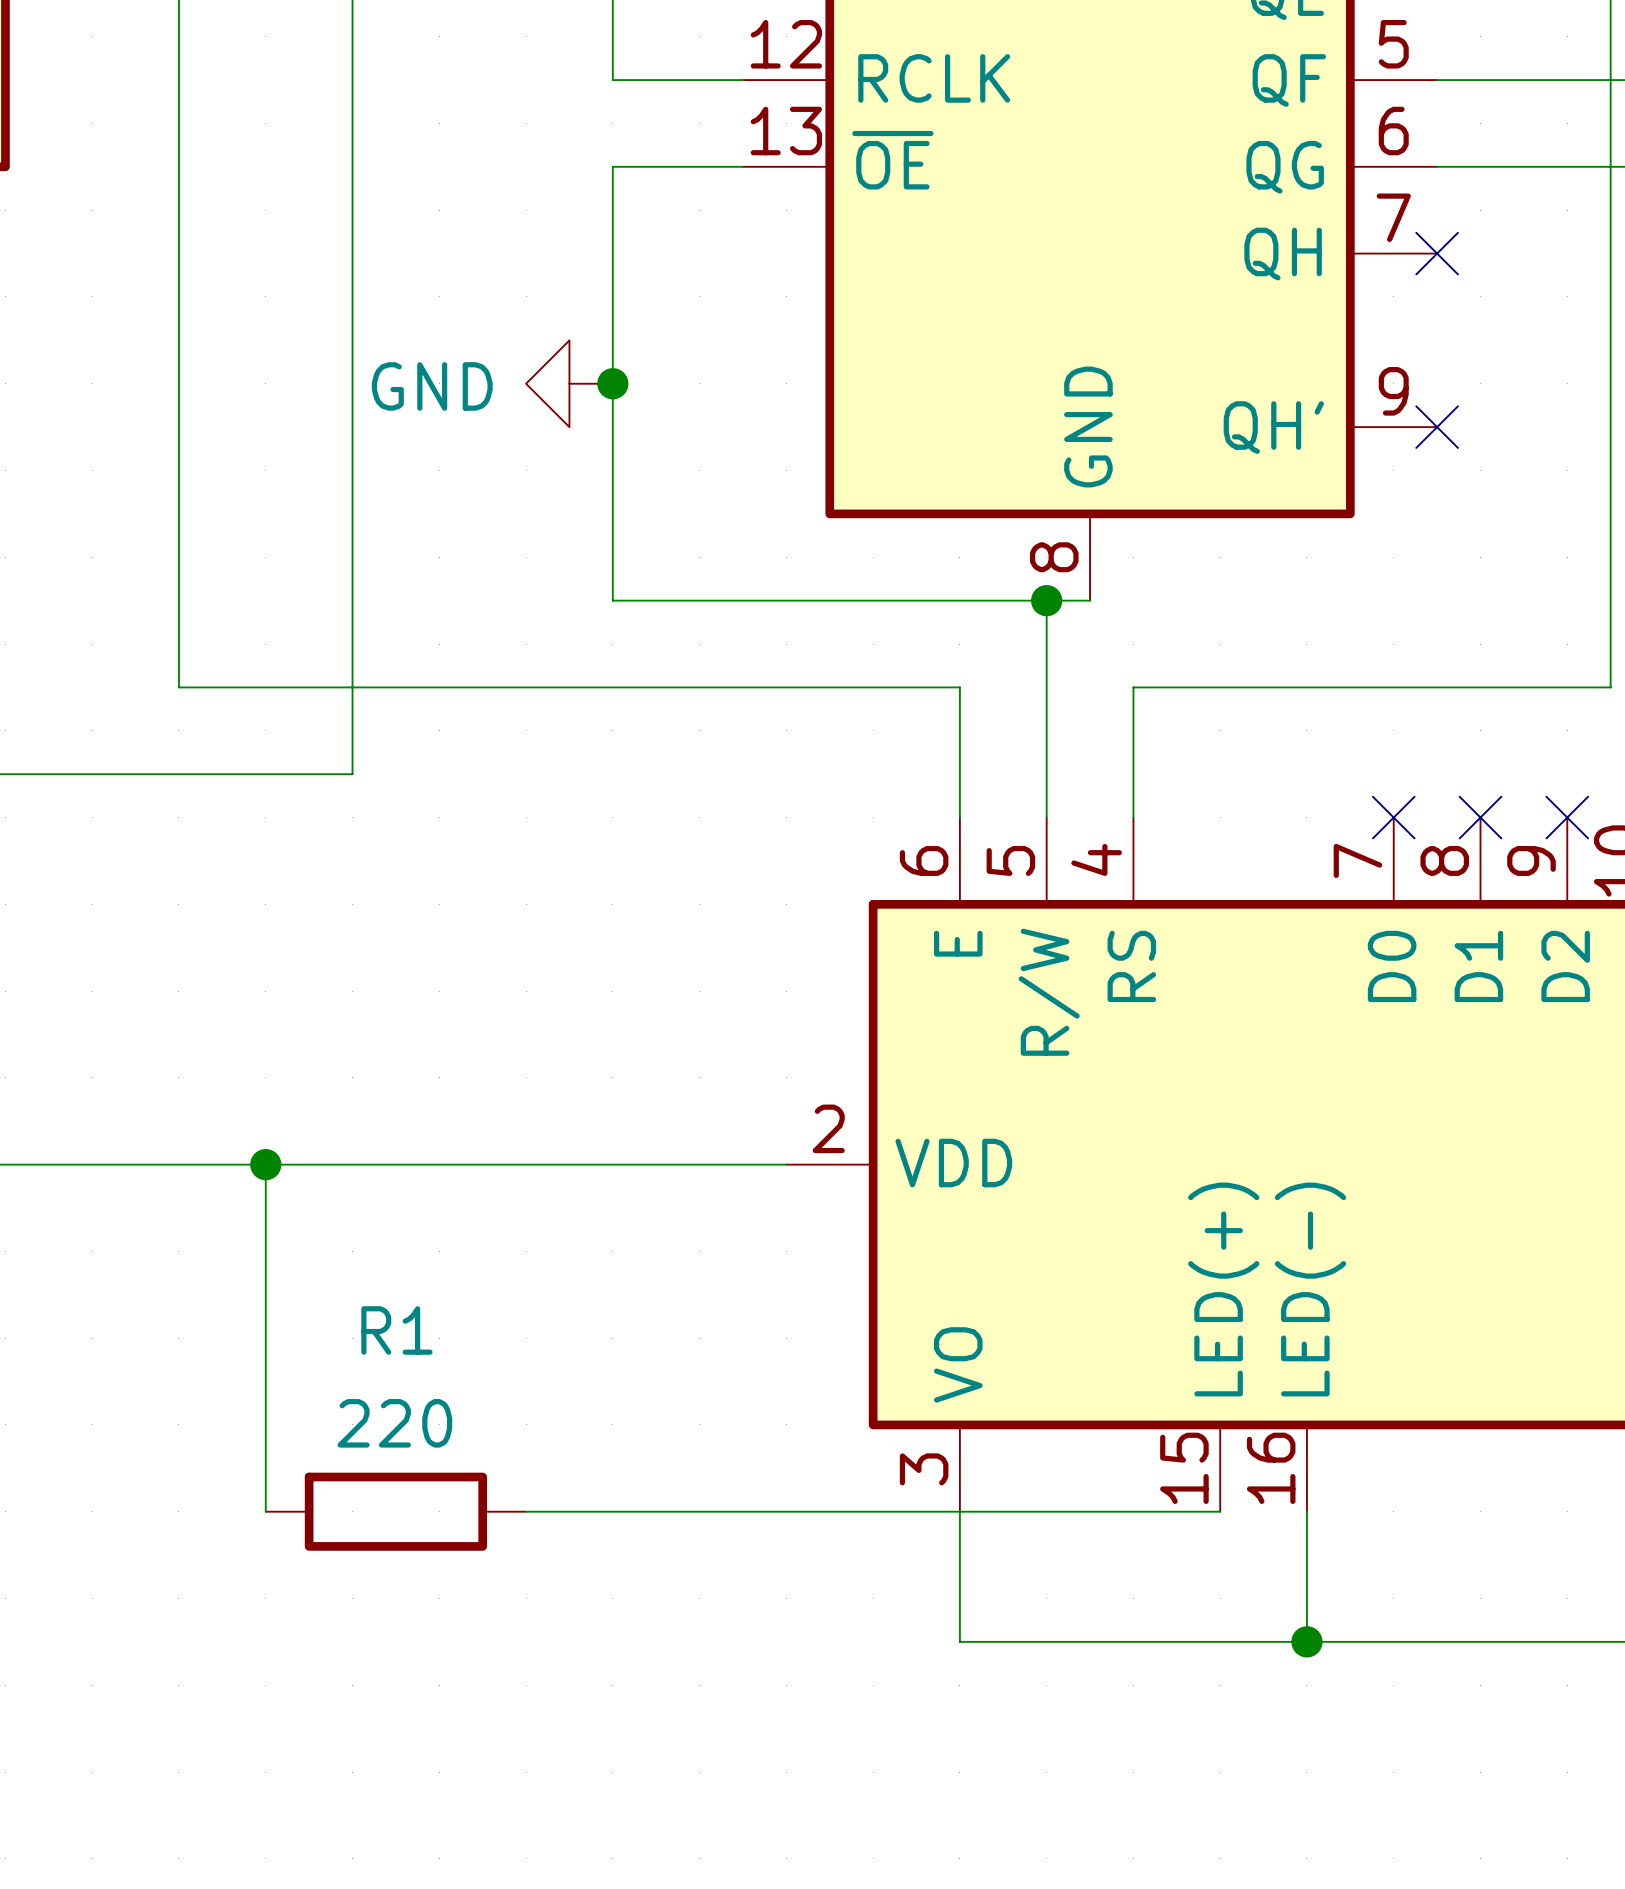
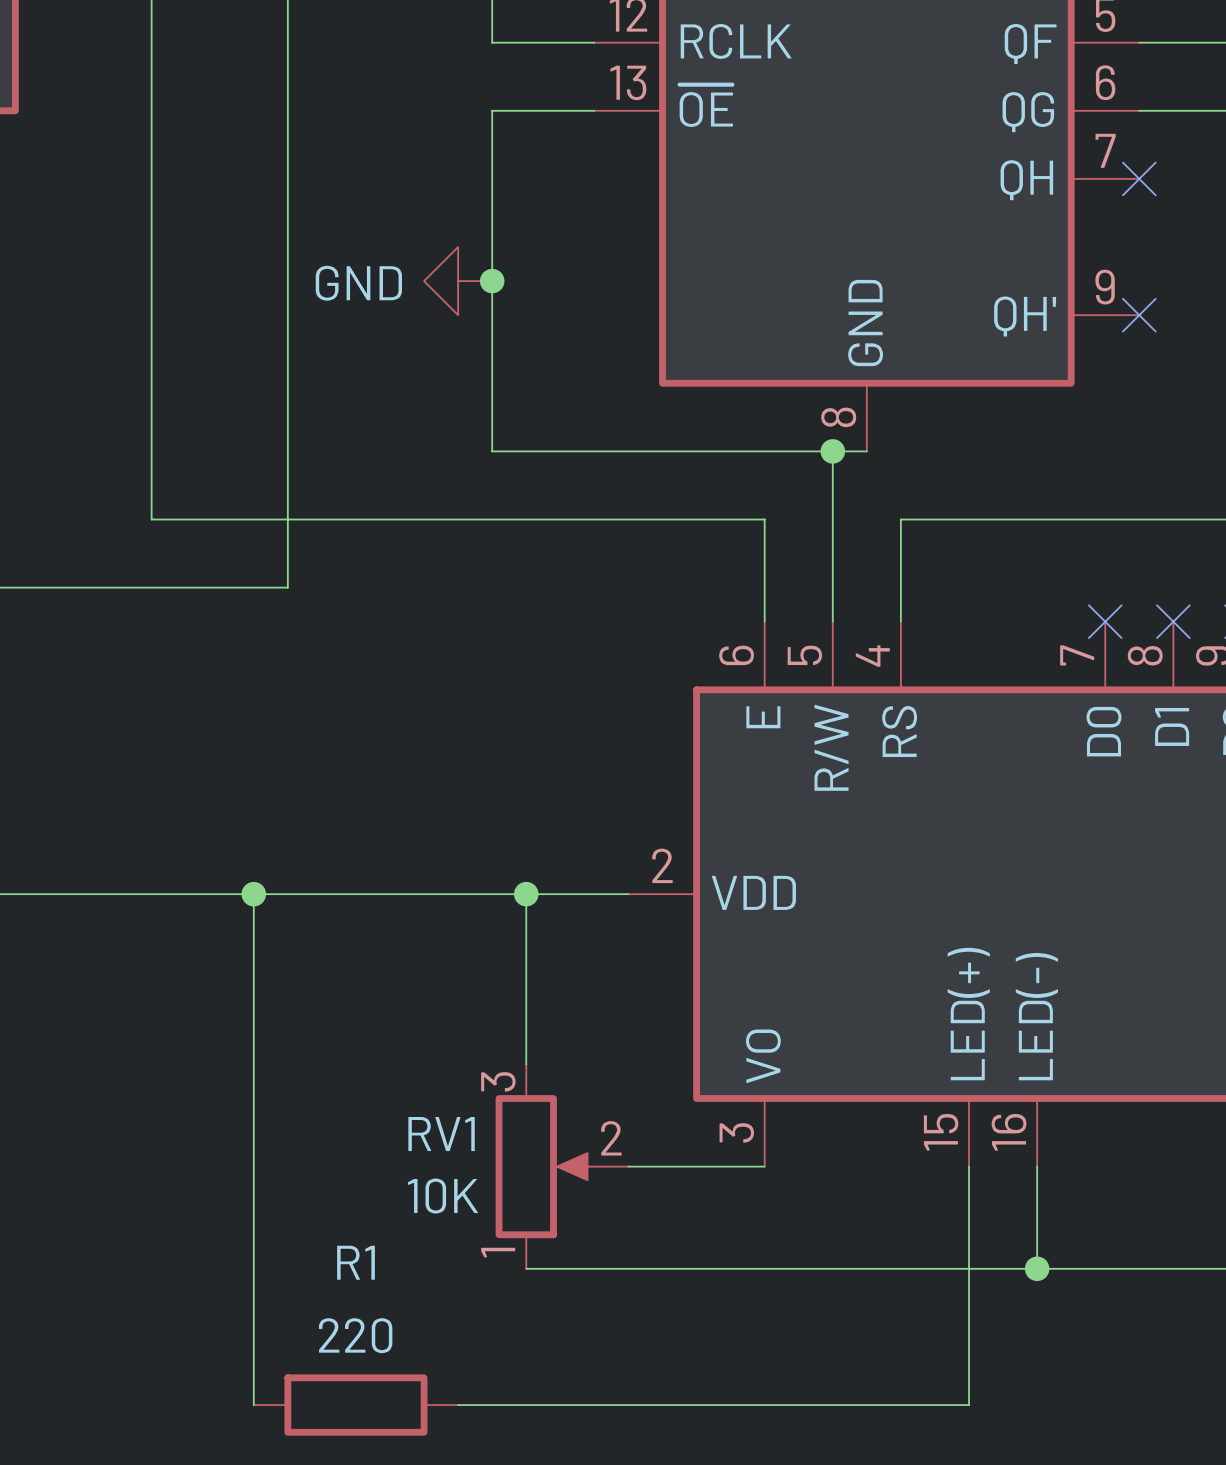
wire: (265, 1164) (265, 1511) -> none
junction position: (265, 1164) -> (253, 894)
wire: none -> (253, 894) (253, 1405)
wire: none -> (526, 894) (526, 1064)
junction: none -> (526, 894)
R1 position: (395, 1511) -> (355, 1405)
wire: (526, 1511) (786, 1511) -> none
RV1: none -> 10K (562, 1166)
wire: (1220, 1511) (959, 1511) (959, 1641) -> (969, 1166) (969, 1405) (458, 1405)
wire: none -> (526, 1268) (764, 1268)

